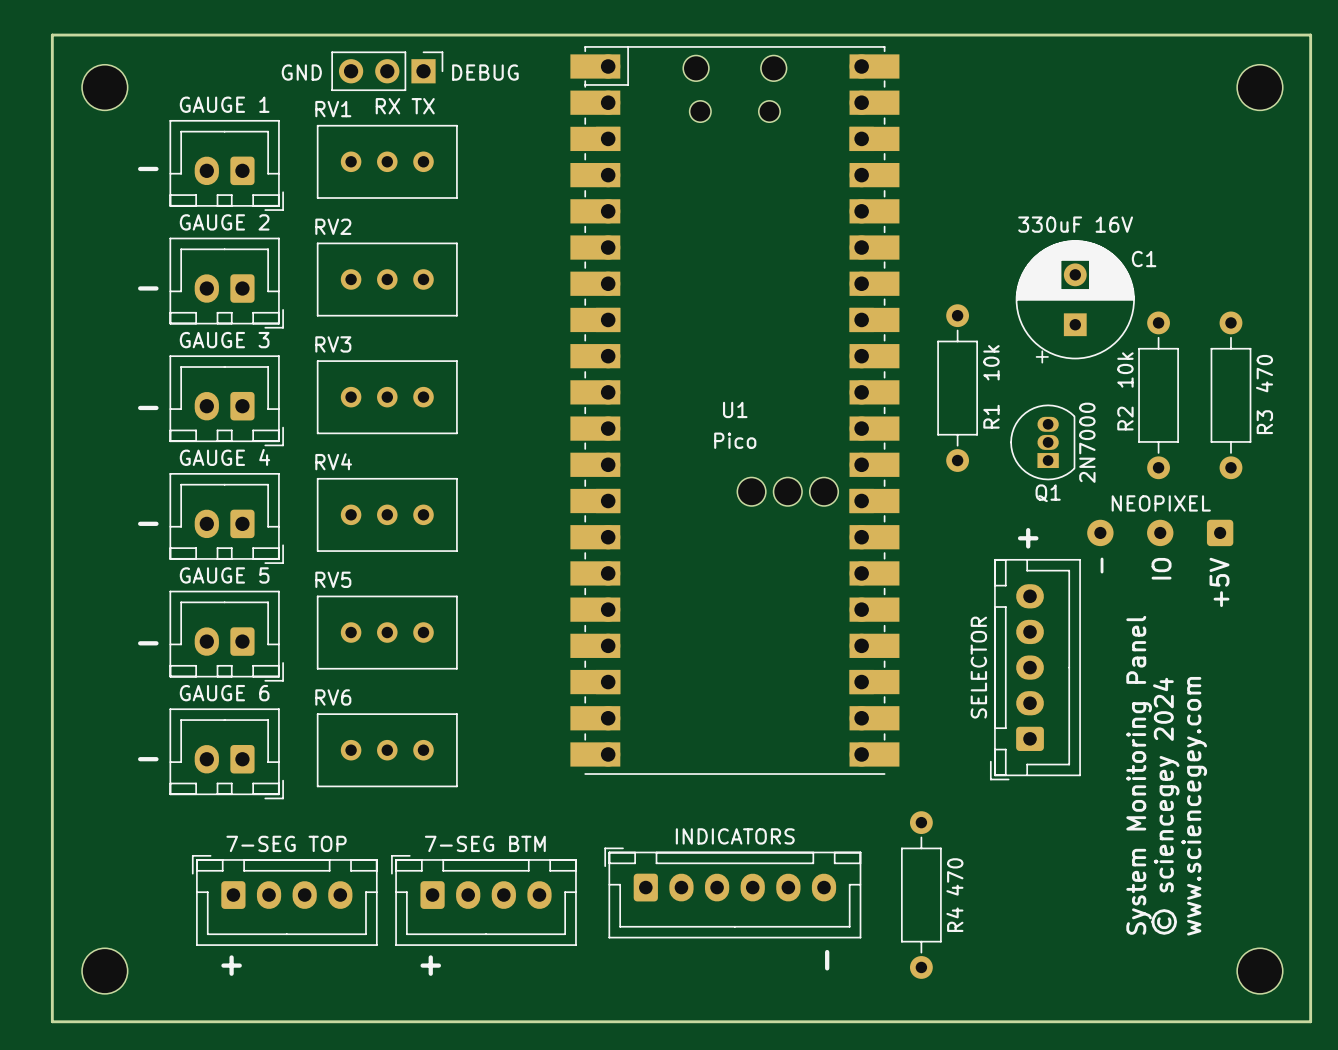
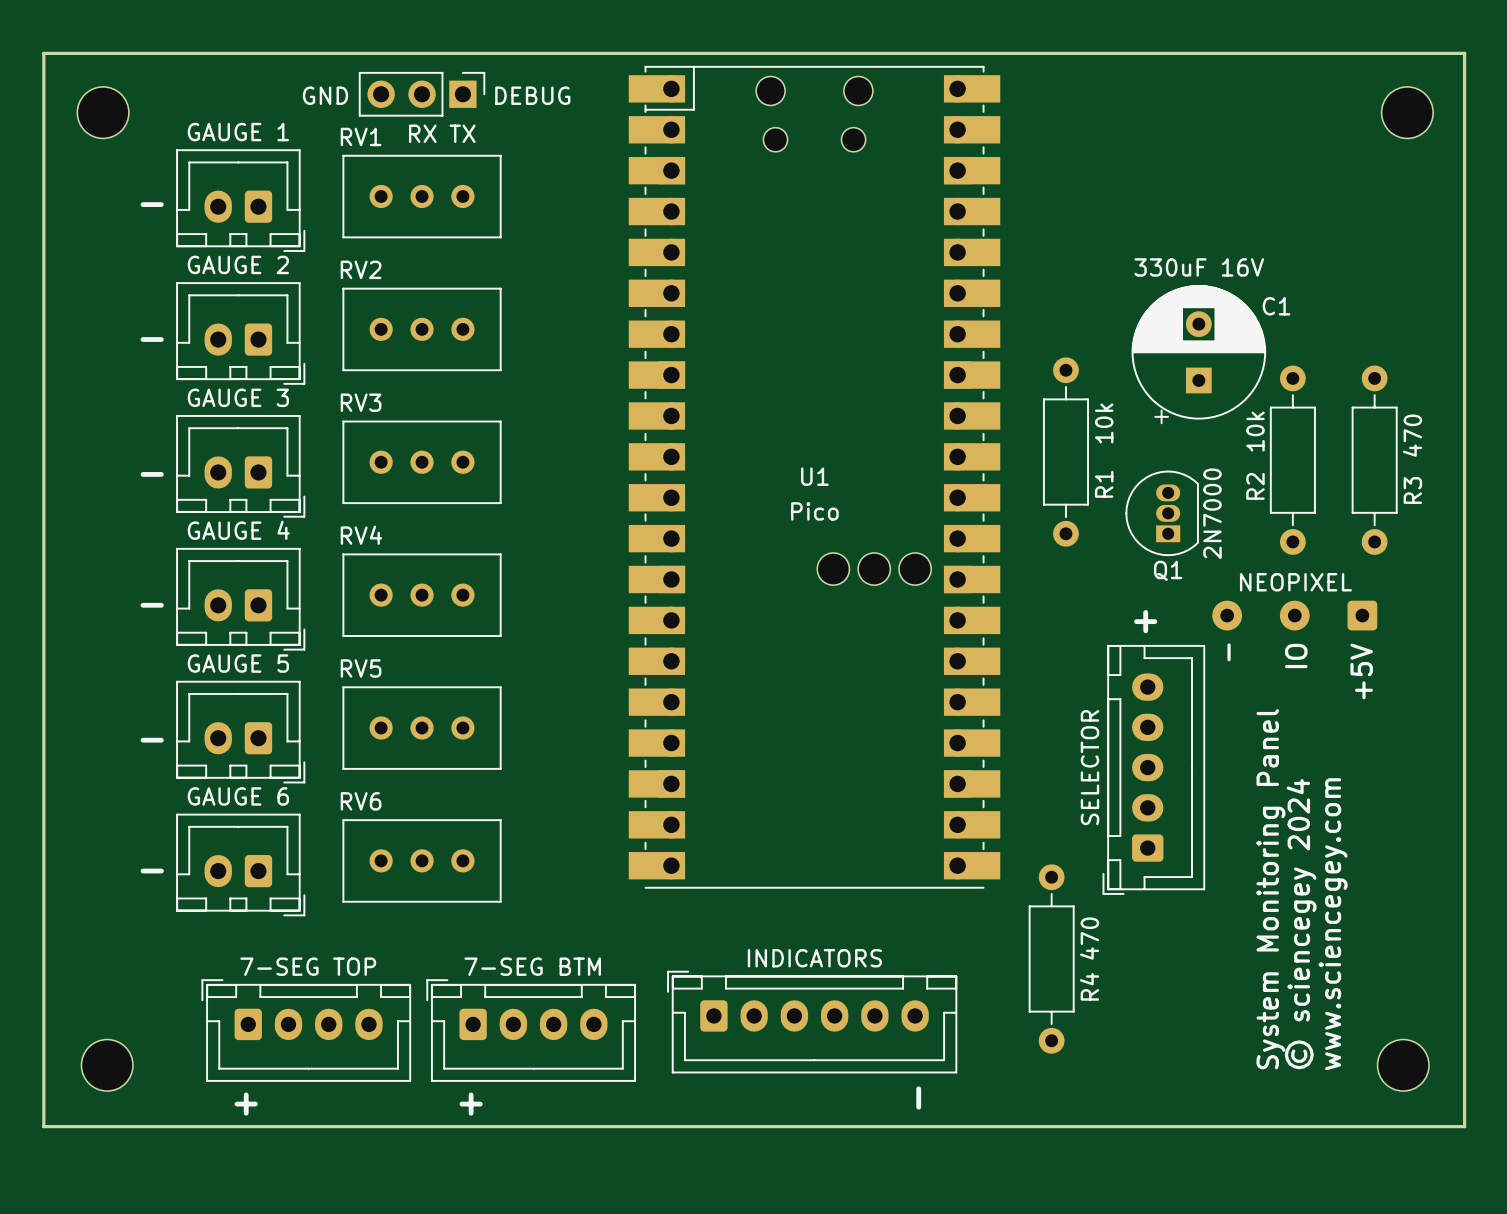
R4 position: (921, 895) -> (1051, 959)
part position: (104, 971) -> (107, 1065)
part position: (1259, 971) -> (1403, 1065)
board edge: (52, 985) (52, 1021) (1310, 1021) (1310, 985) -> (43, 1126) (1464, 1126)

